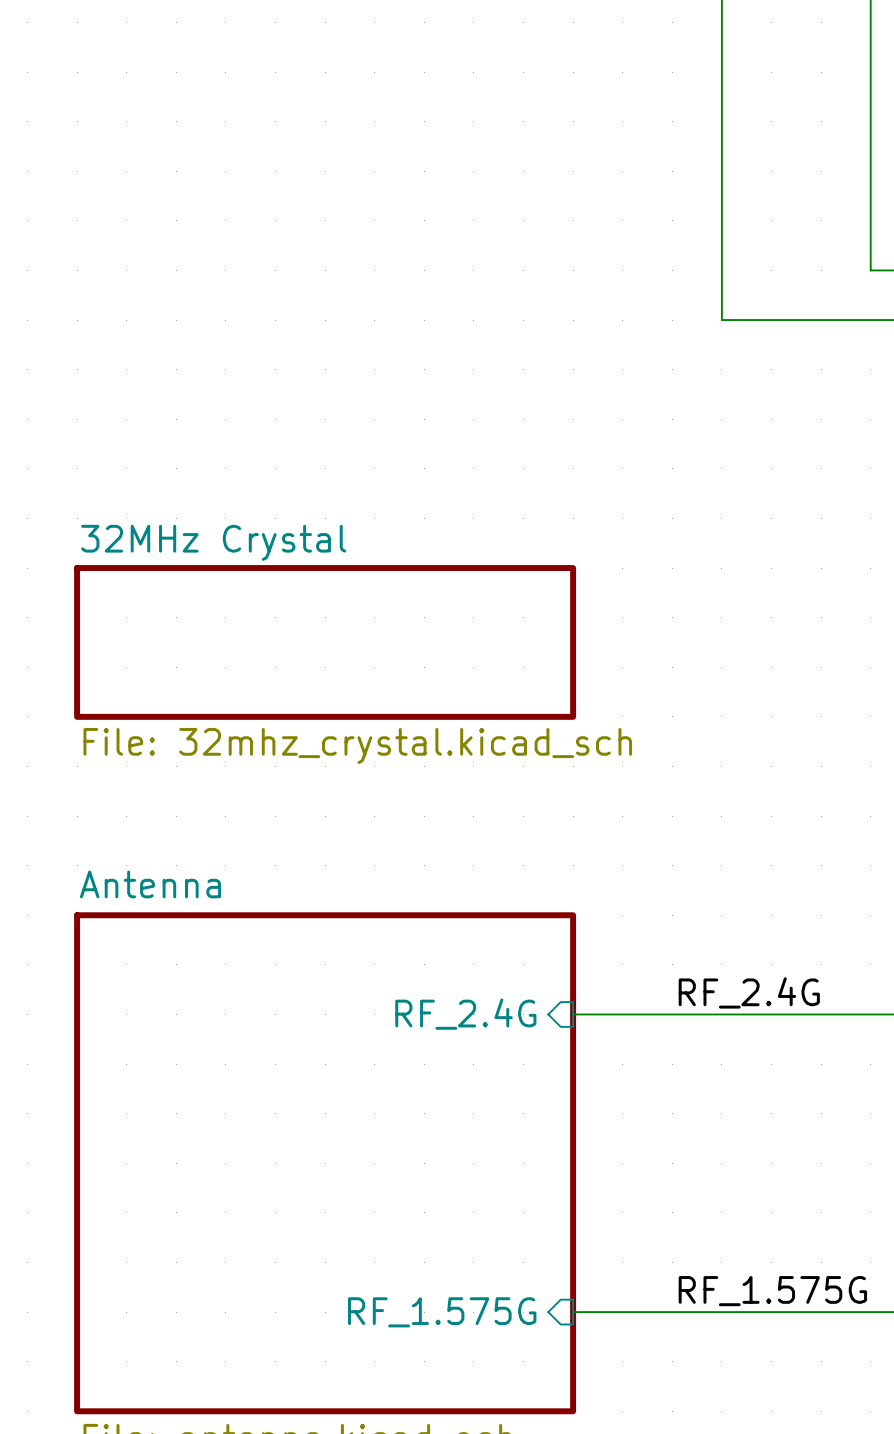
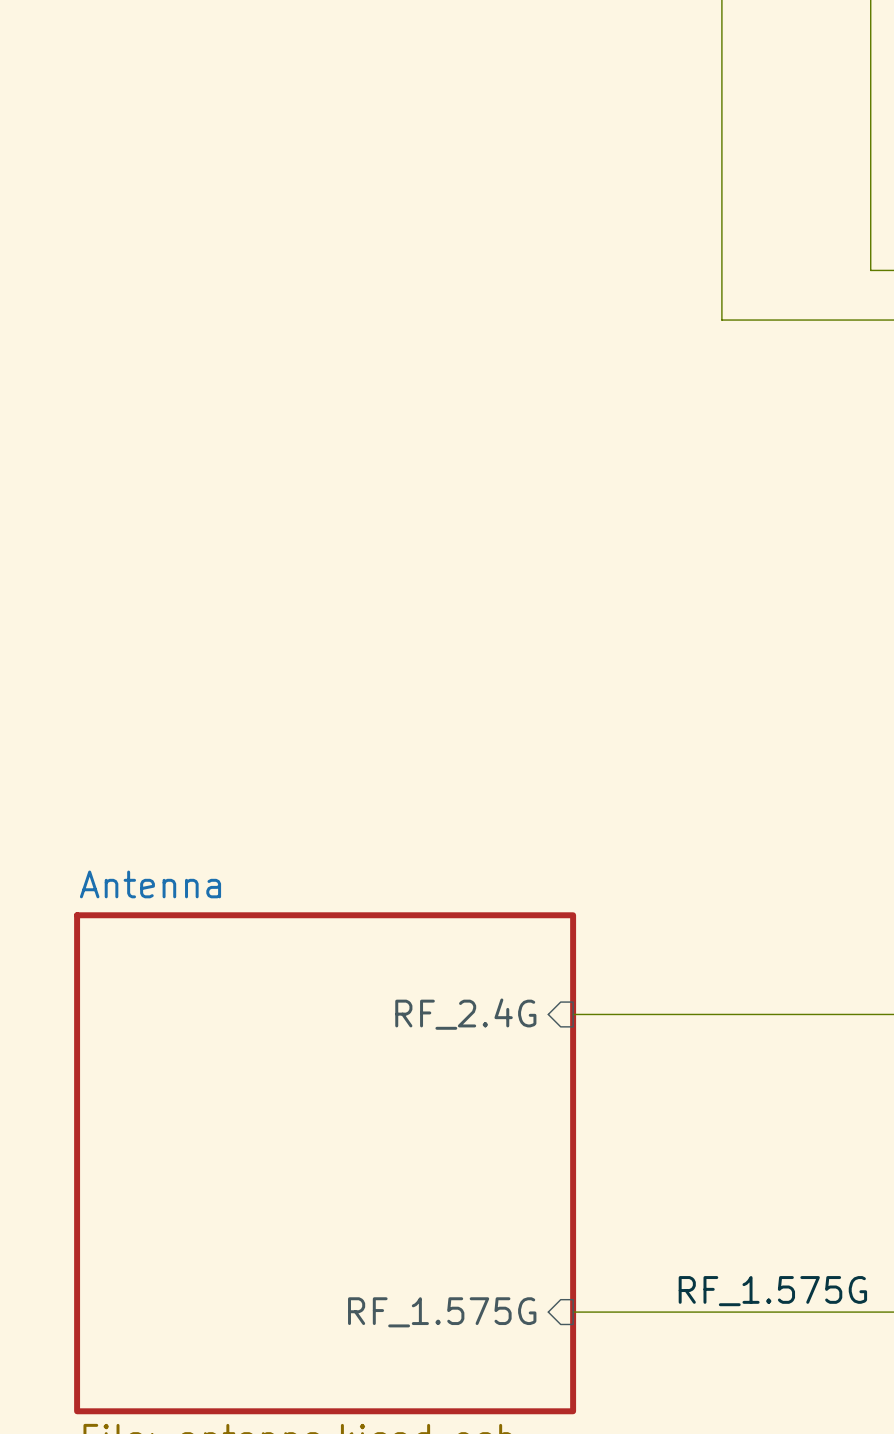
sheet 32MHz Crystal: File: 32mhz_crystal.kicad_sch (325, 642) -> none
label: RF_2.4G (749, 992) -> none

